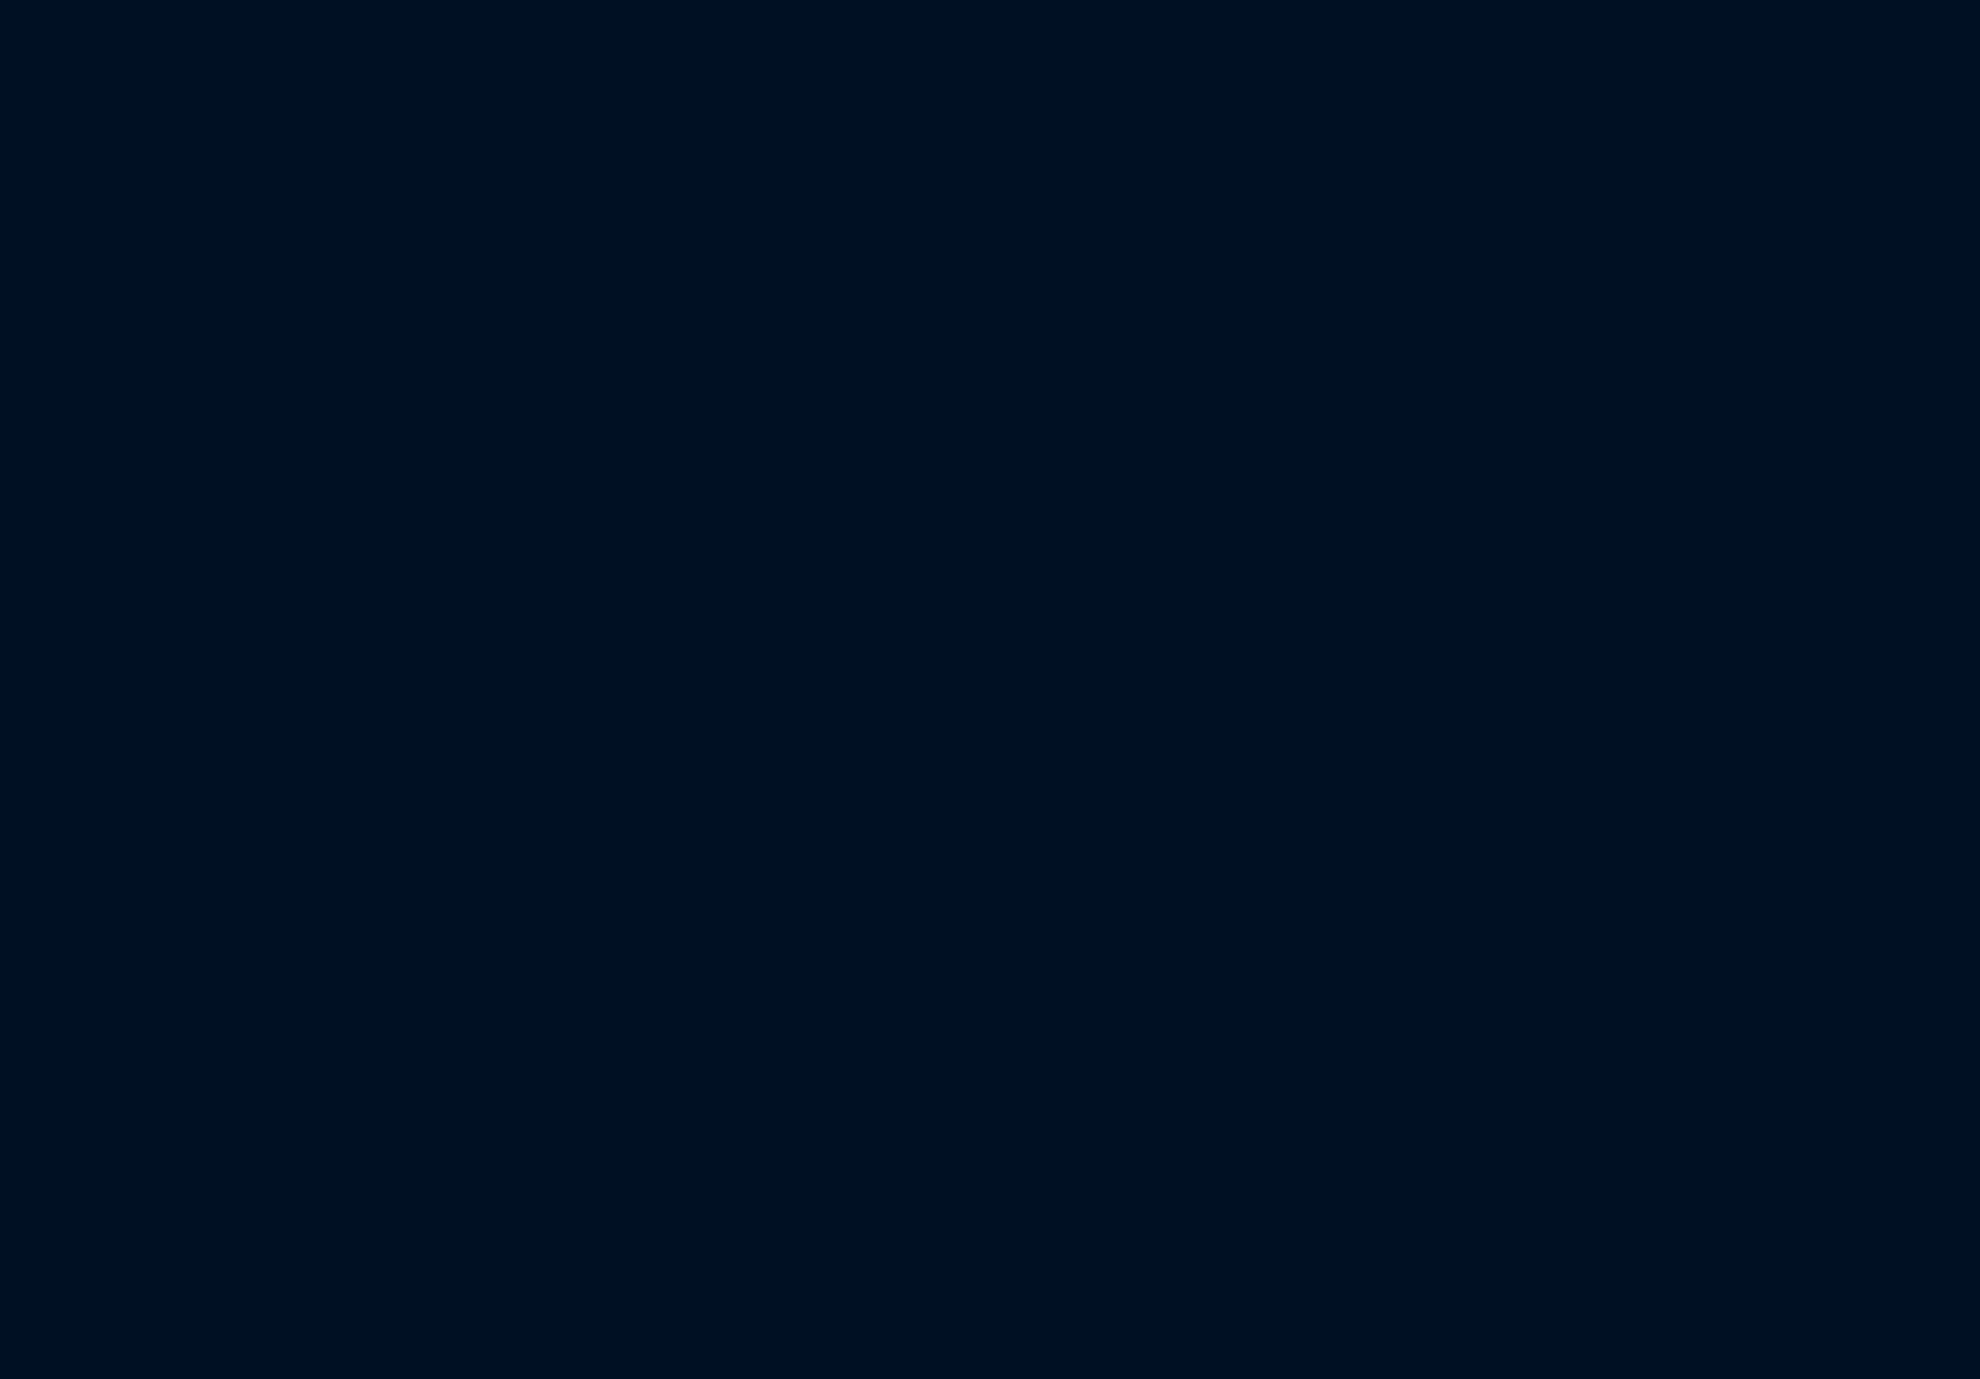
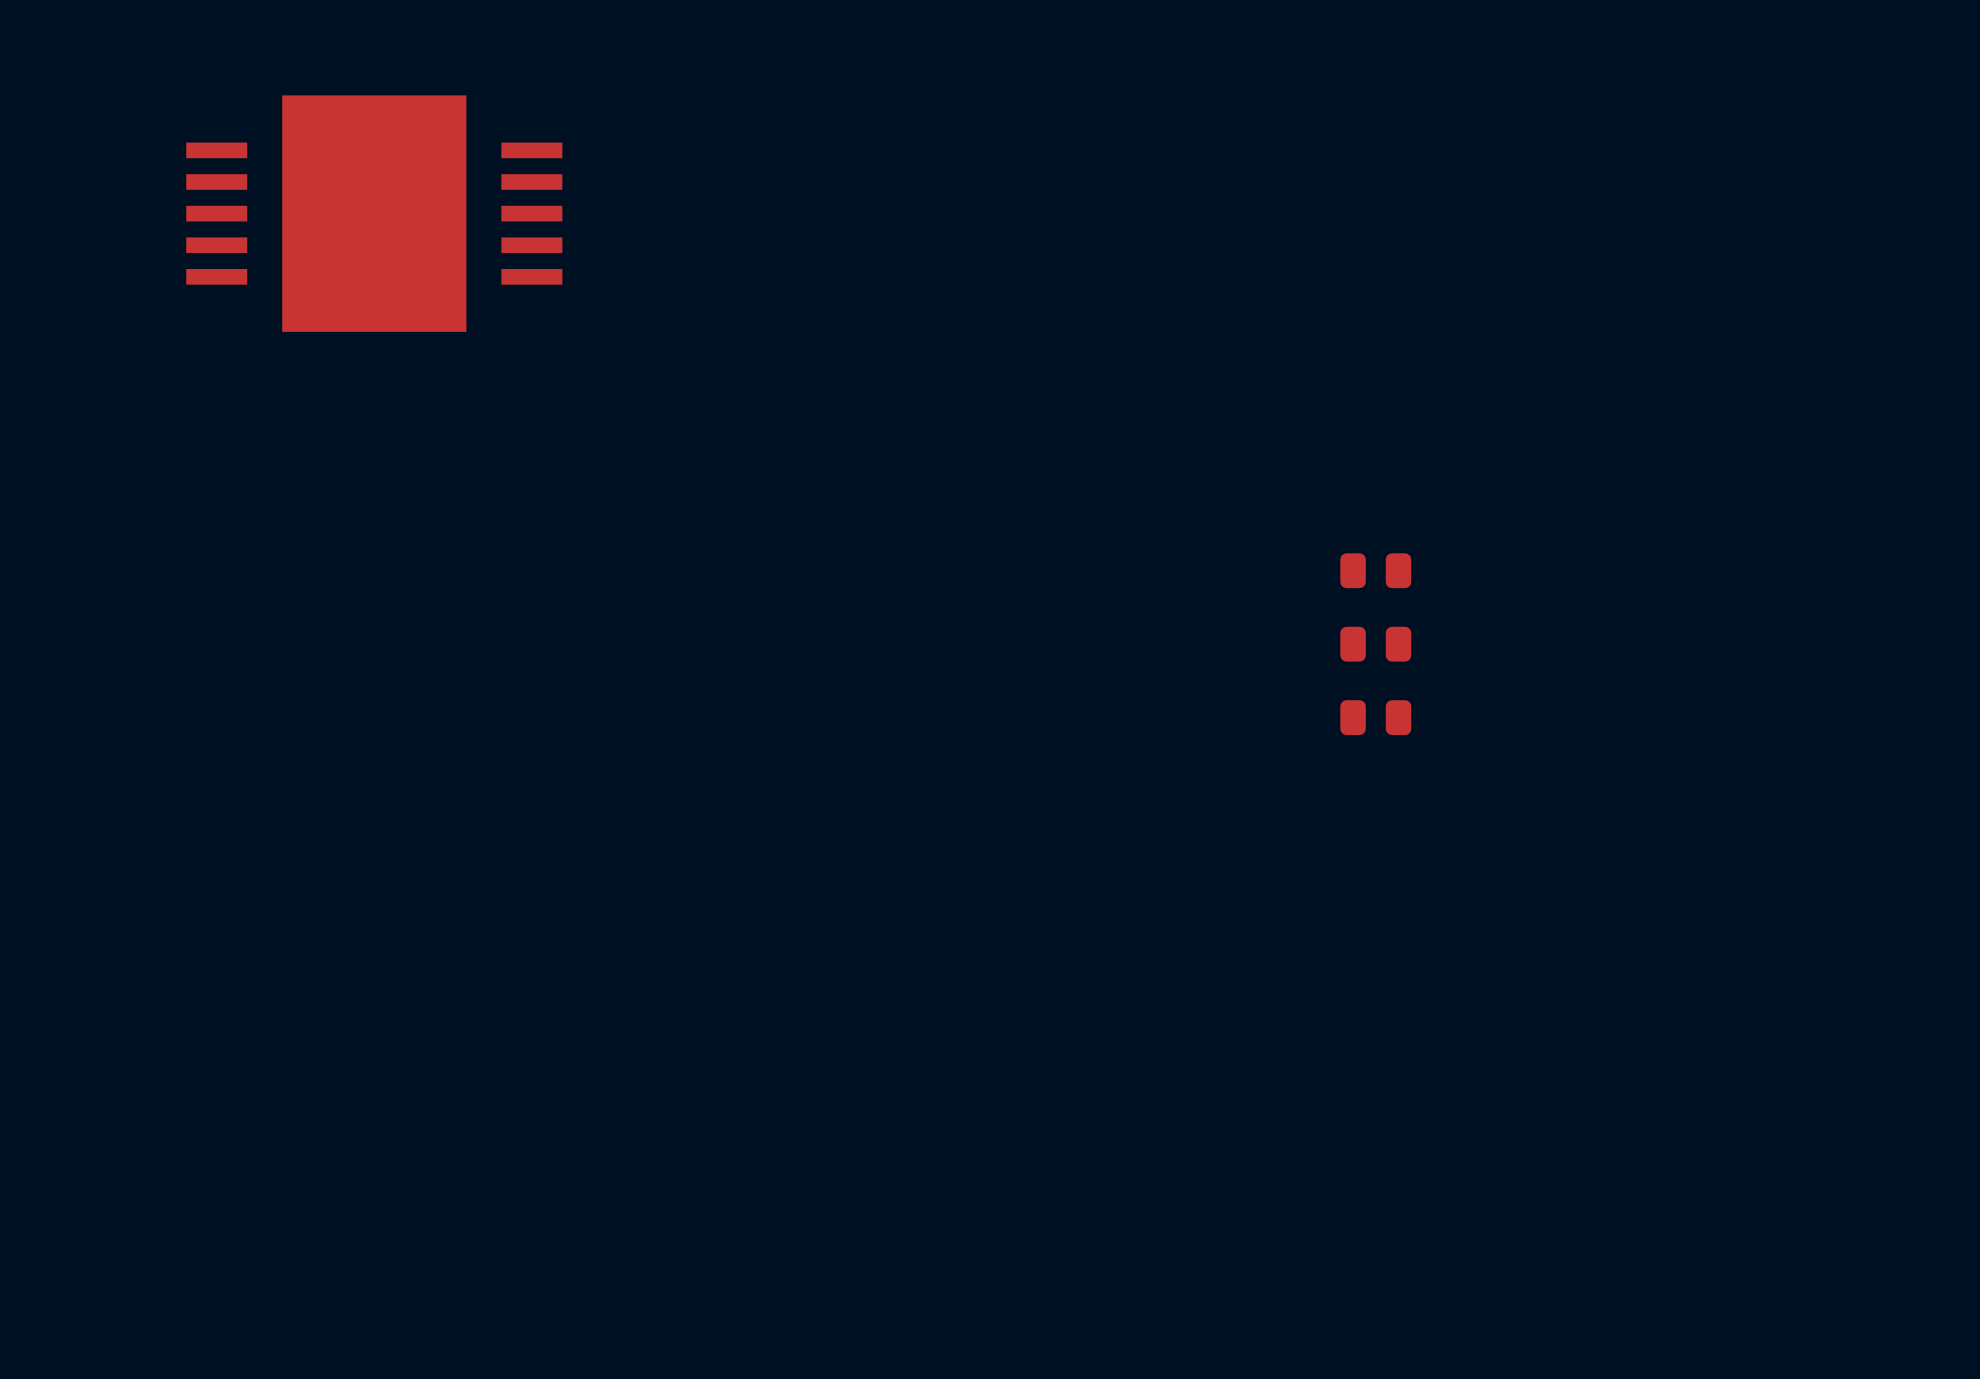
part: none -> (374, 213)
part: none -> (1375, 570)
part: none -> (1375, 644)
part: none -> (1375, 717)

